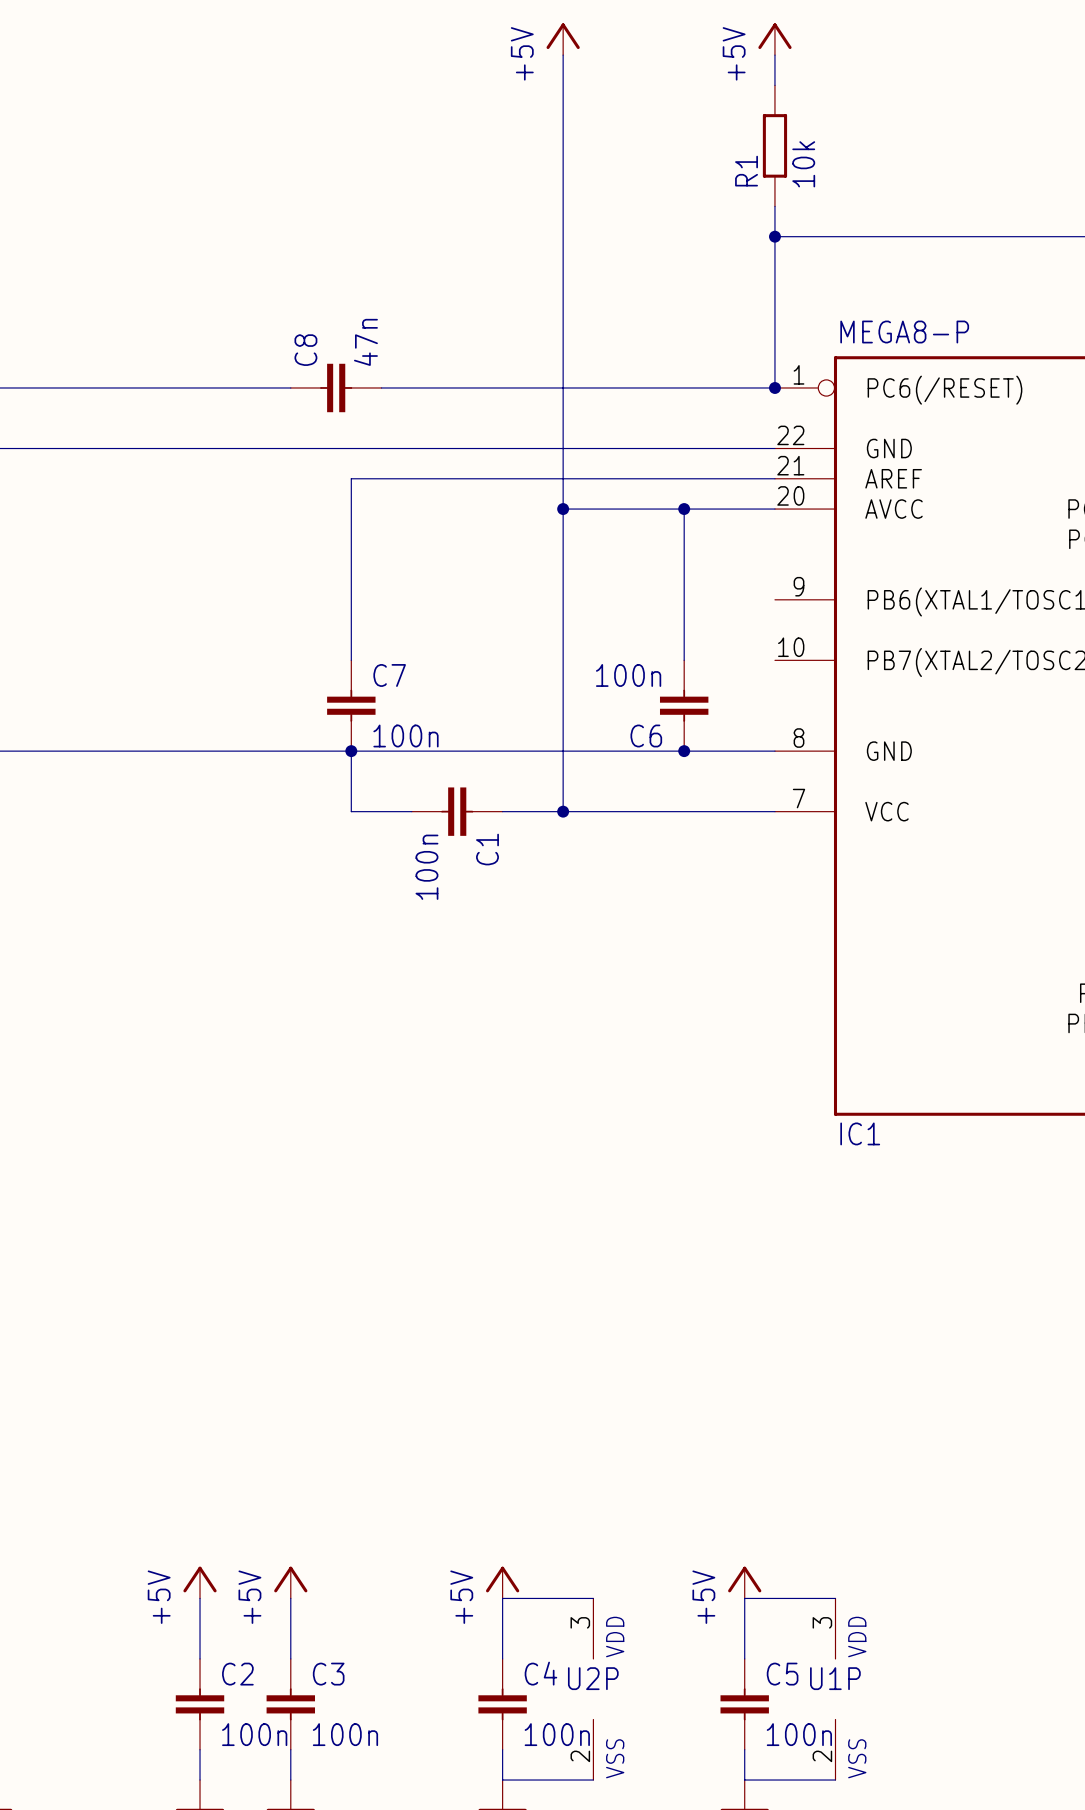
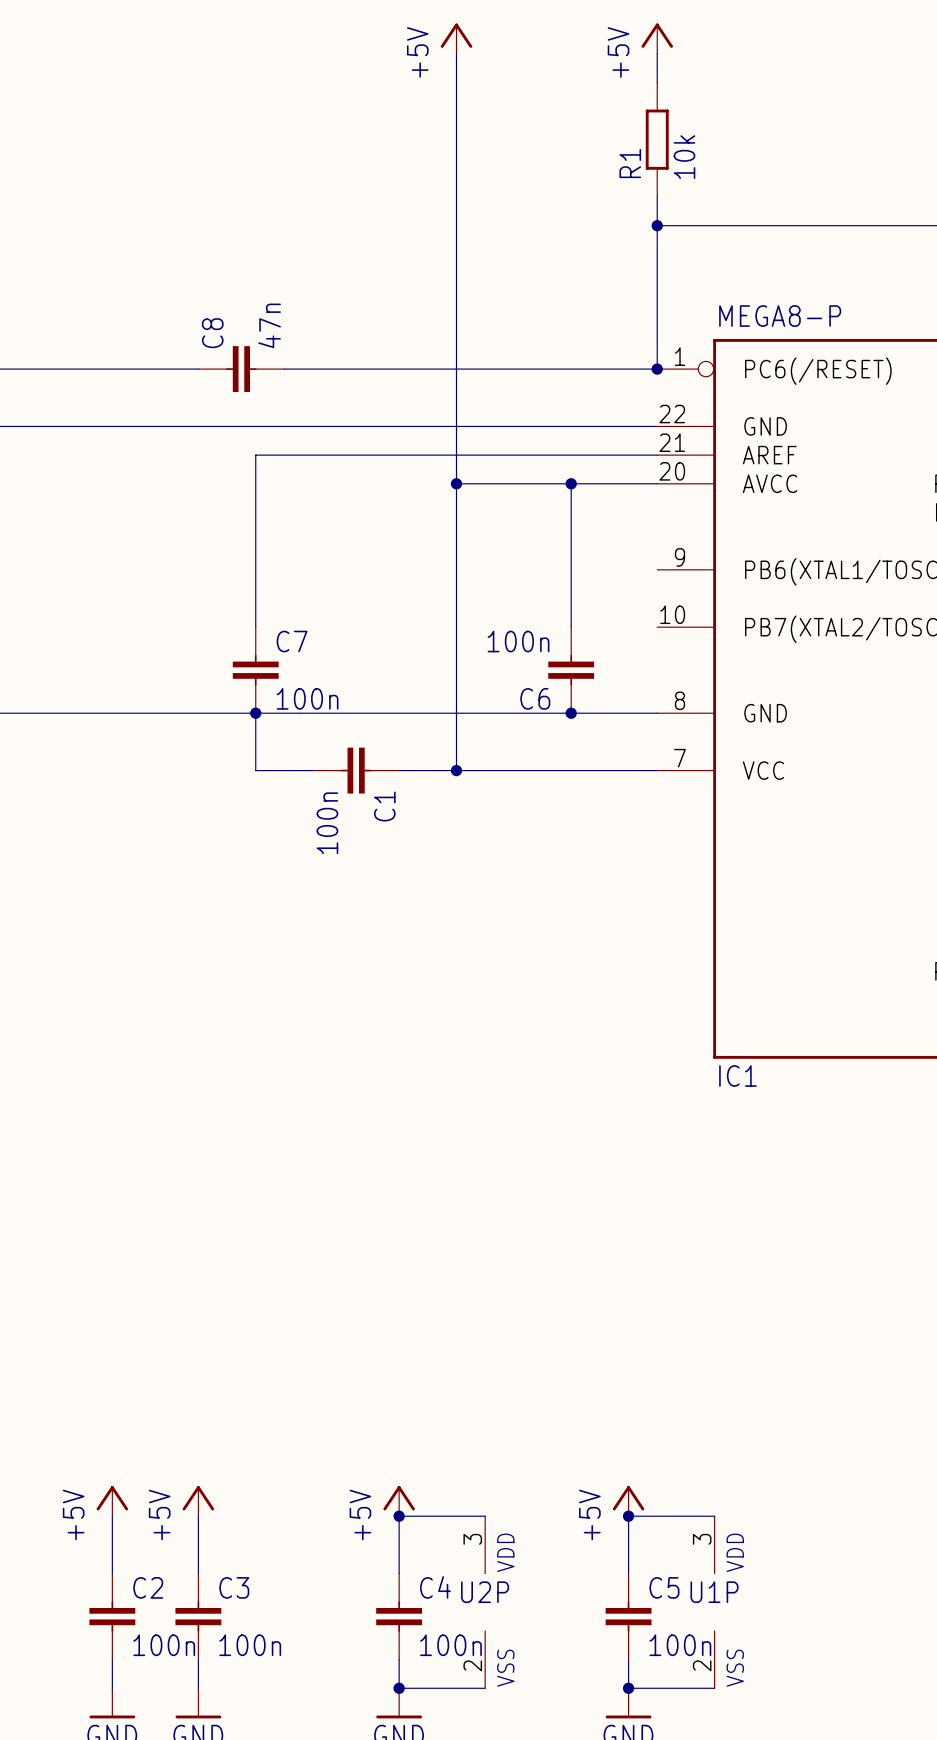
junction: none -> (399, 1516)
junction: none -> (628, 1516)
junction: none -> (399, 1688)
junction: none -> (628, 1688)

